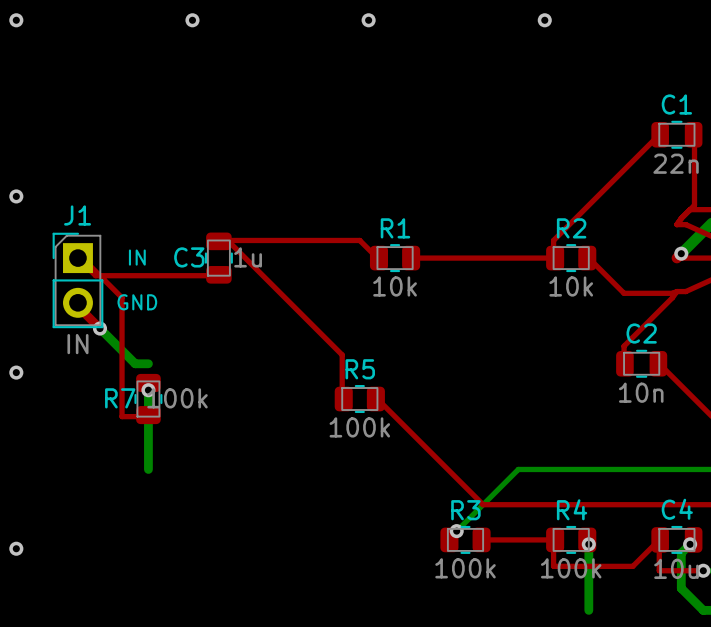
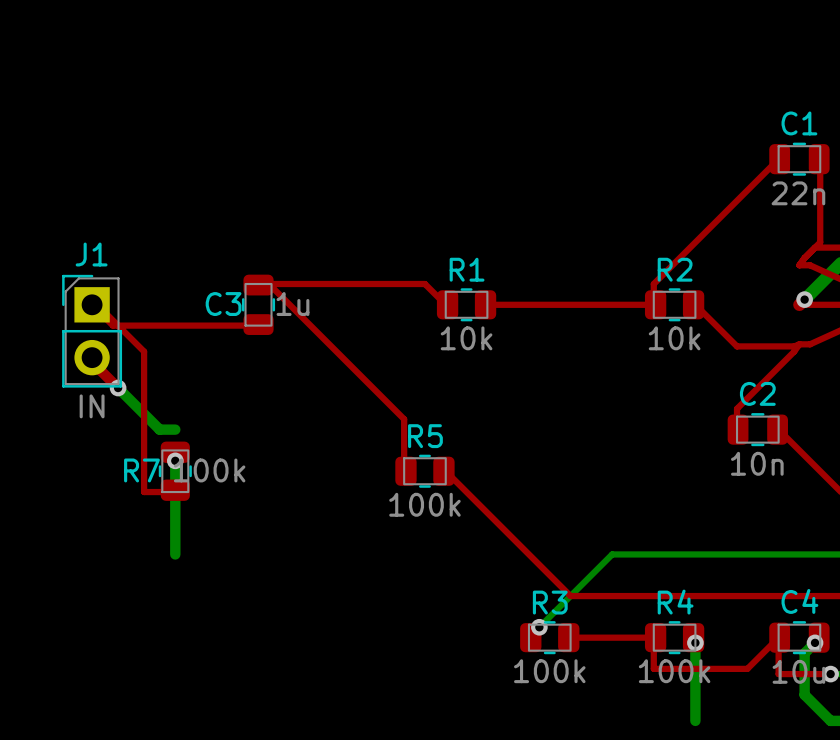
via: (16, 20) -> none
via: (192, 20) -> none
via: (368, 20) -> none
via: (544, 20) -> none
via: (16, 196) -> none
text: IN (137, 257) -> none
text: GND (137, 302) -> none
via: (16, 372) -> none
via: (16, 548) -> none

